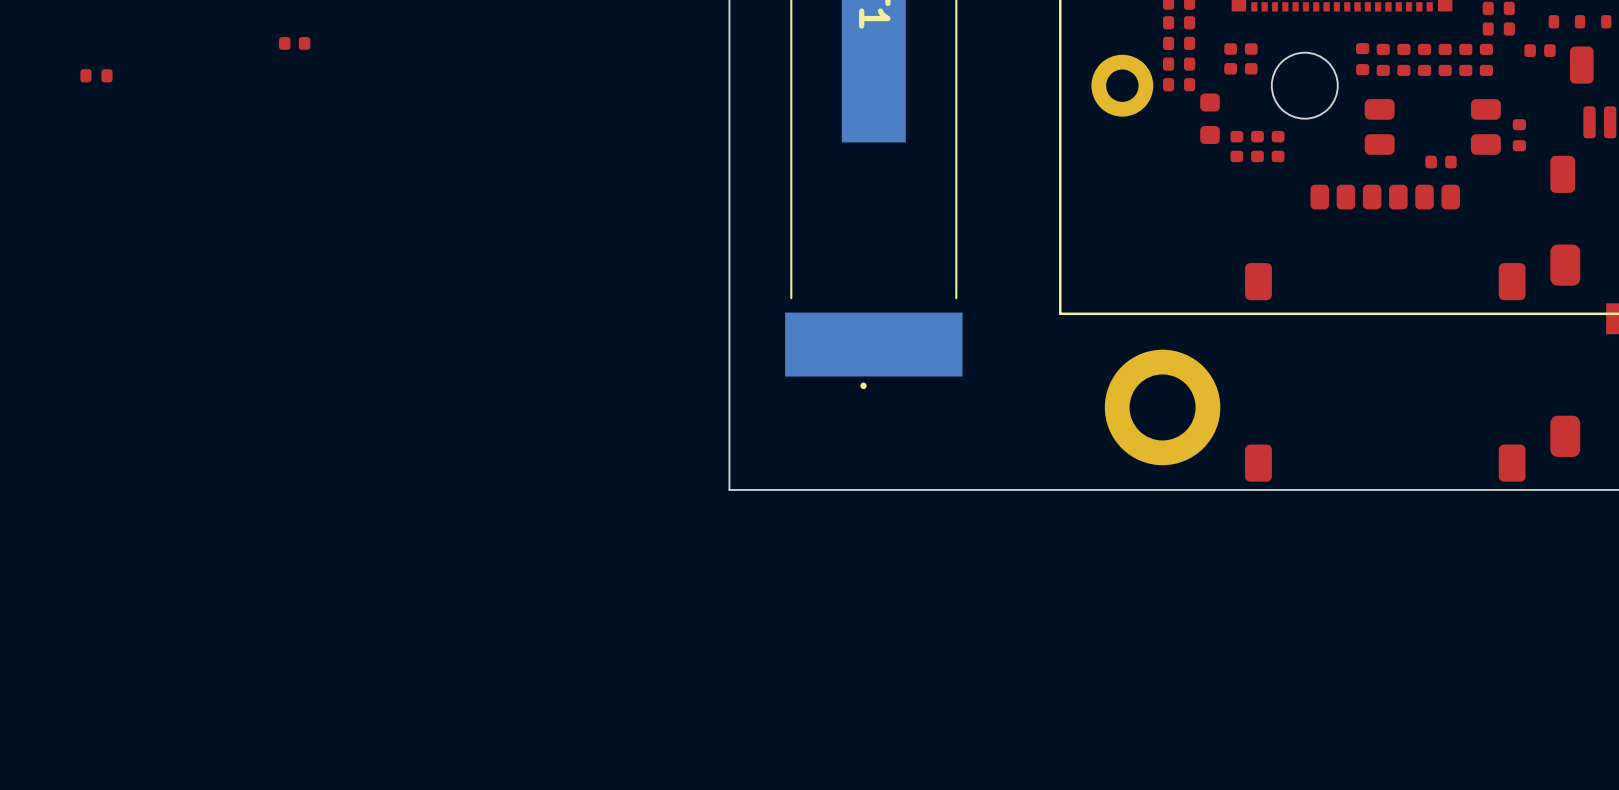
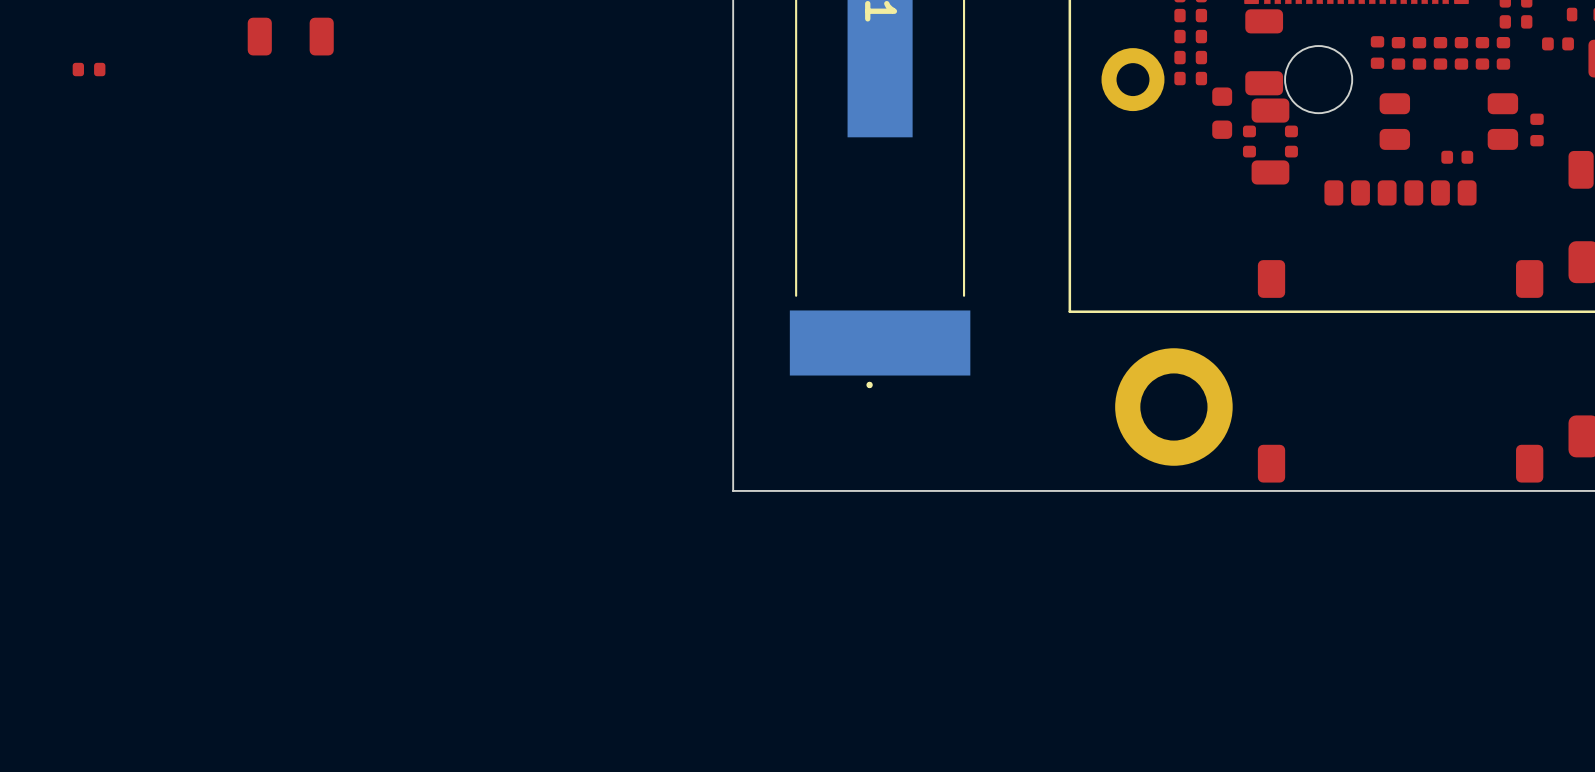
part footprint: [278, 37, 311, 50] -> [247, 17, 334, 56]
part footprint: [1244, 43, 1258, 75] -> [1245, 9, 1284, 96]
part: (1230, 58) -> none
part footprint: [1251, 130, 1264, 163] -> [1251, 98, 1290, 185]

